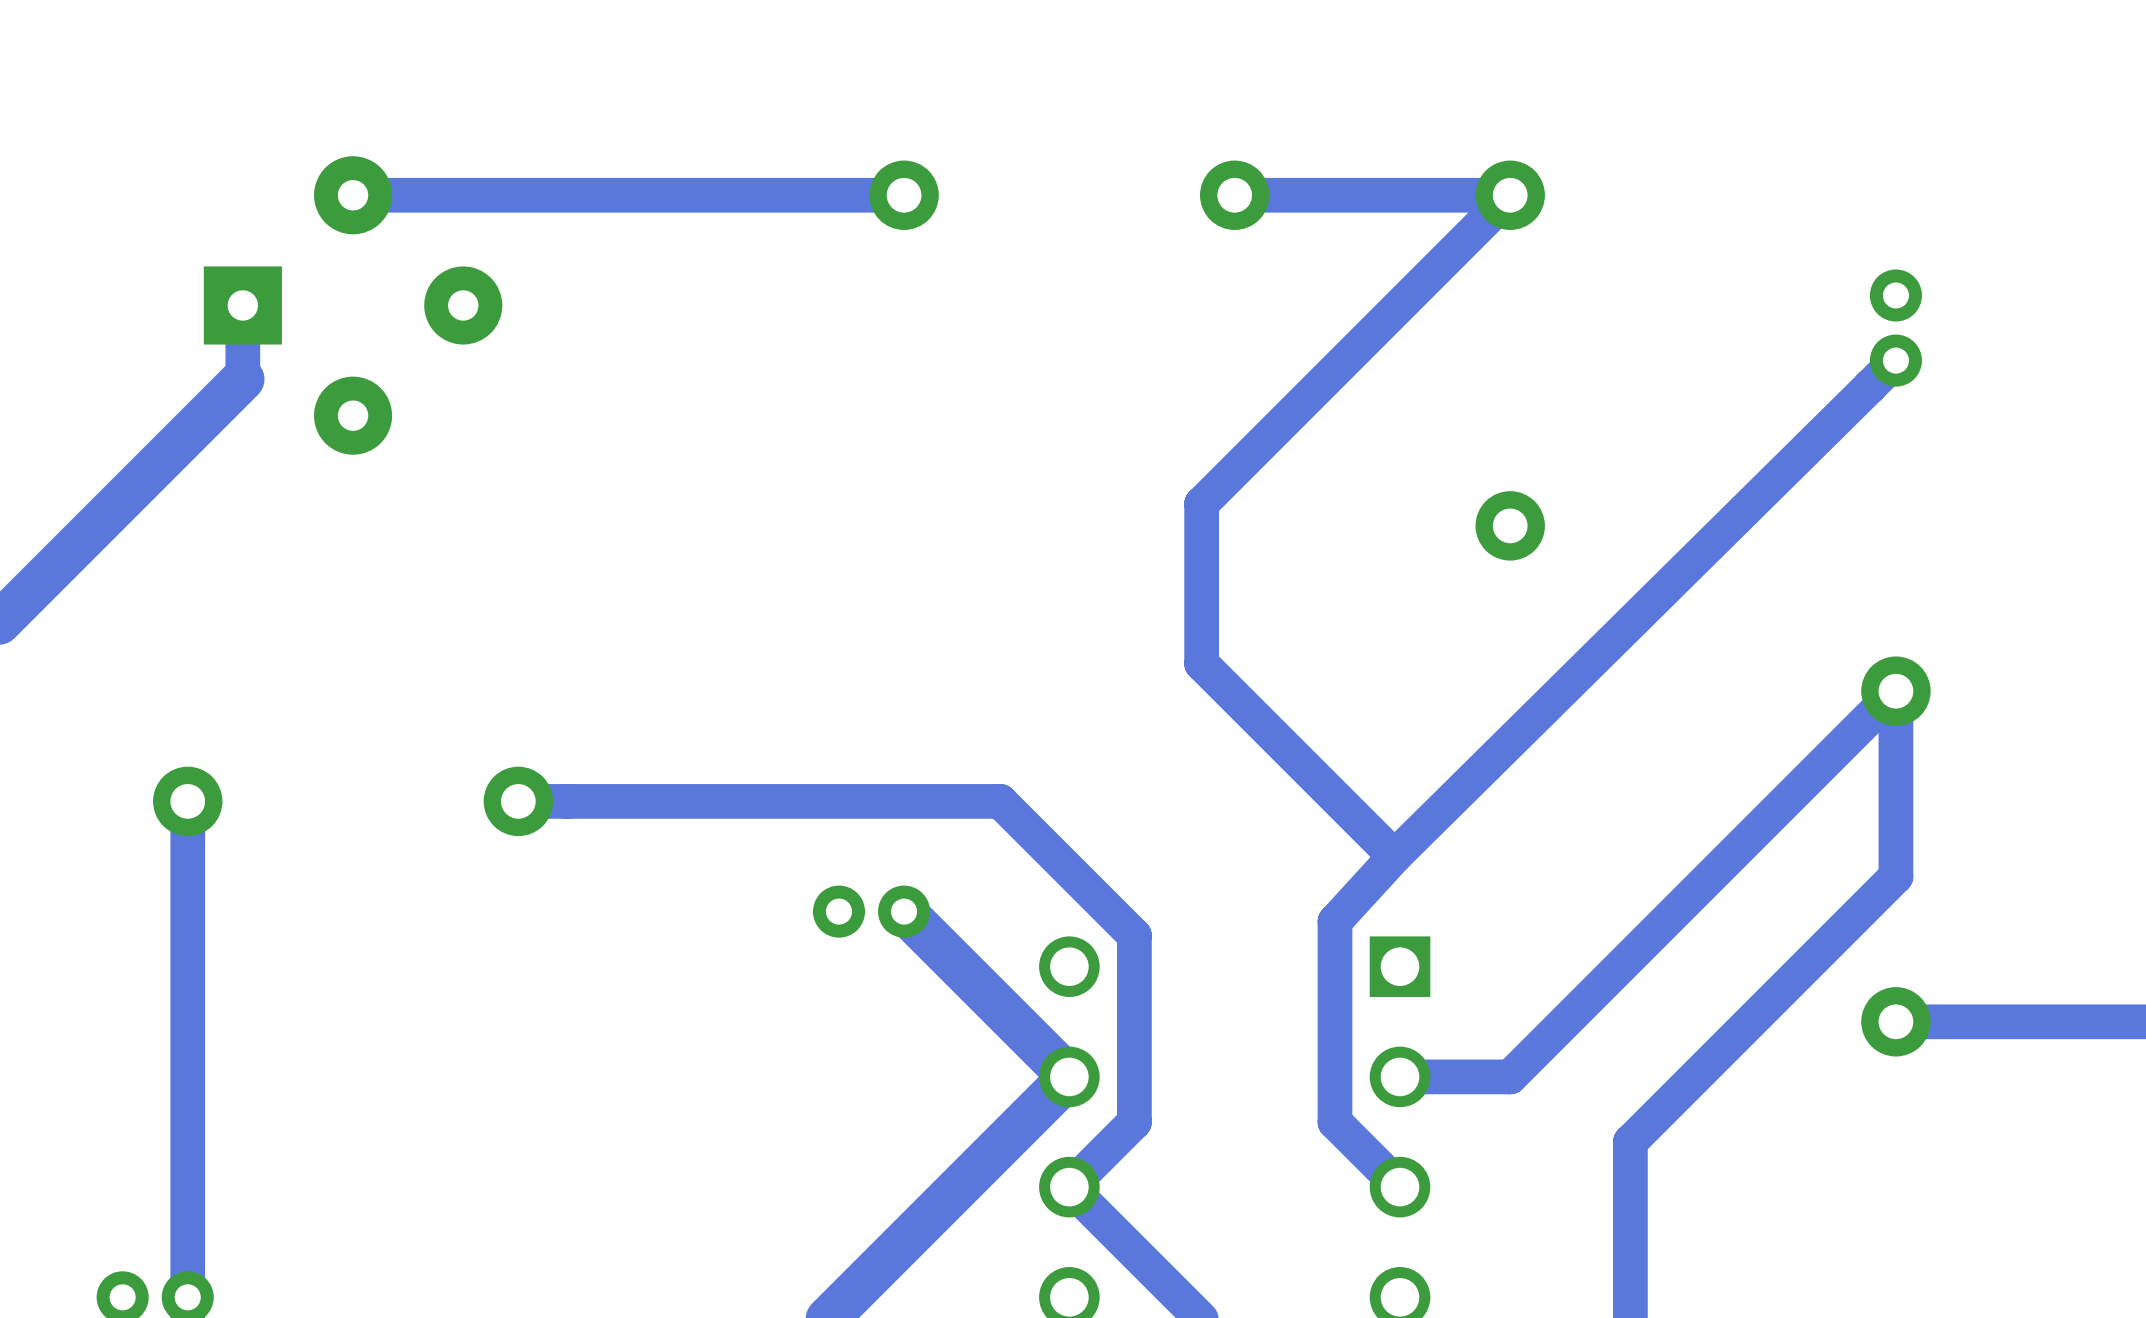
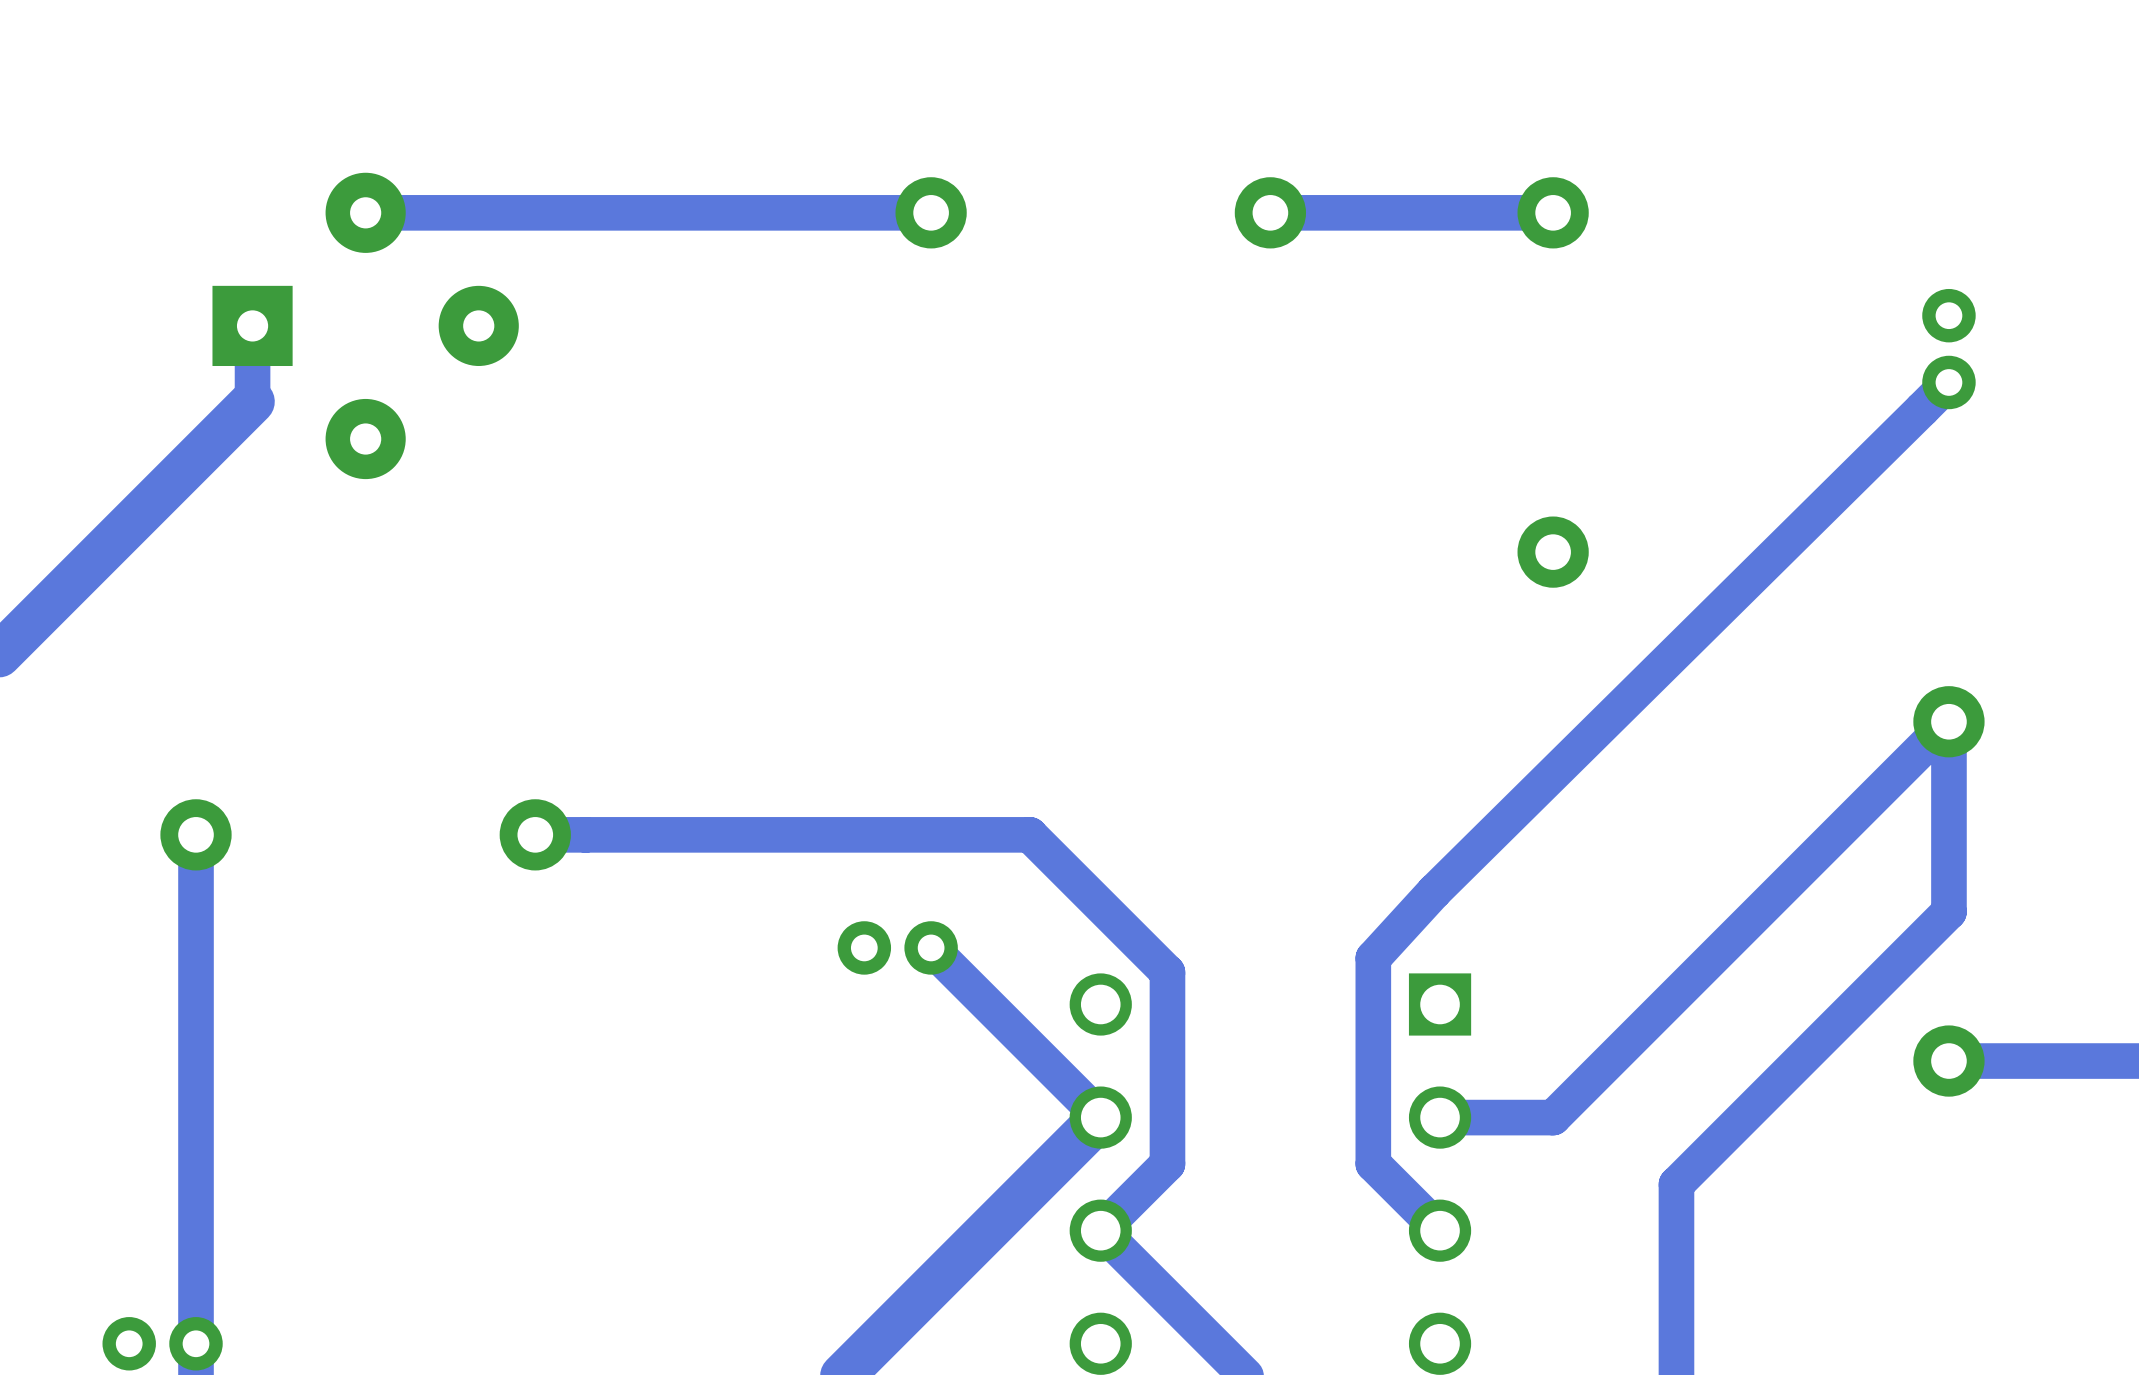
track: (1510, 195) (1201, 503) (1201, 663) (1394, 856) -> none
track width: thick (904, 911) (1069, 1076) -> thin (931, 947) (1100, 1117)

